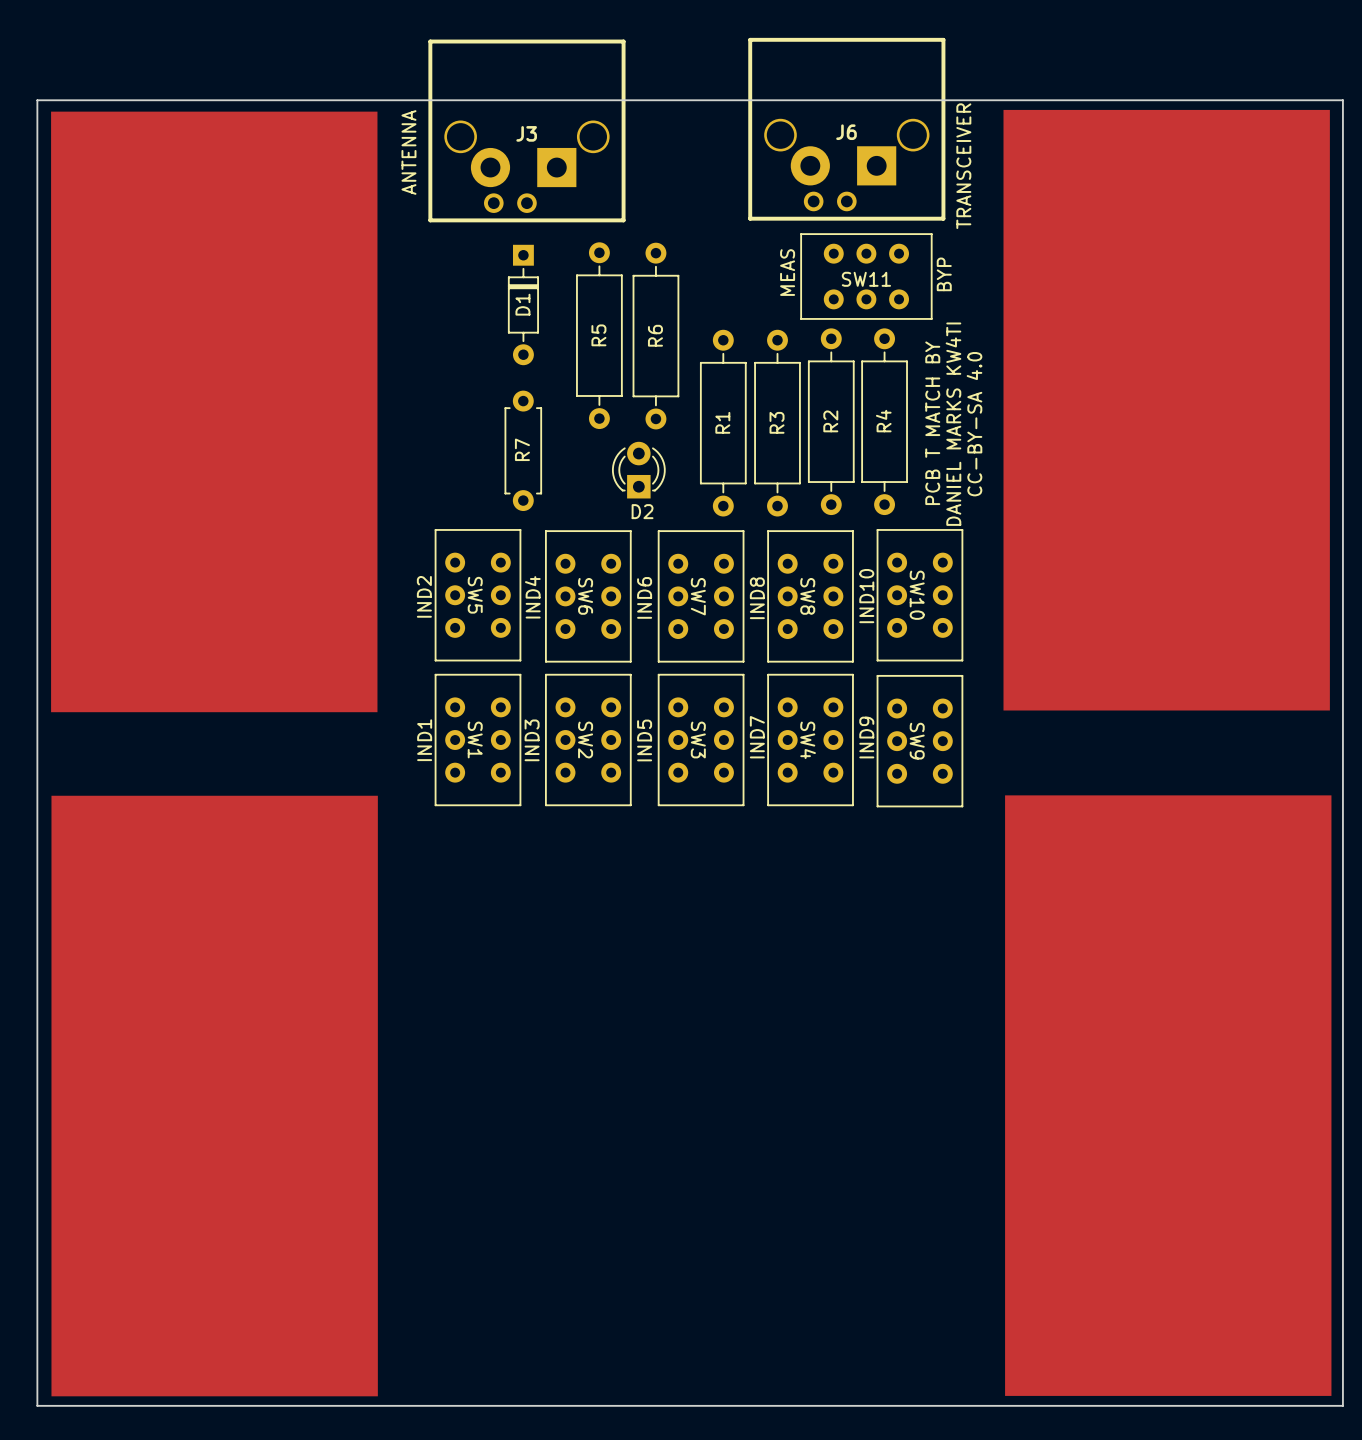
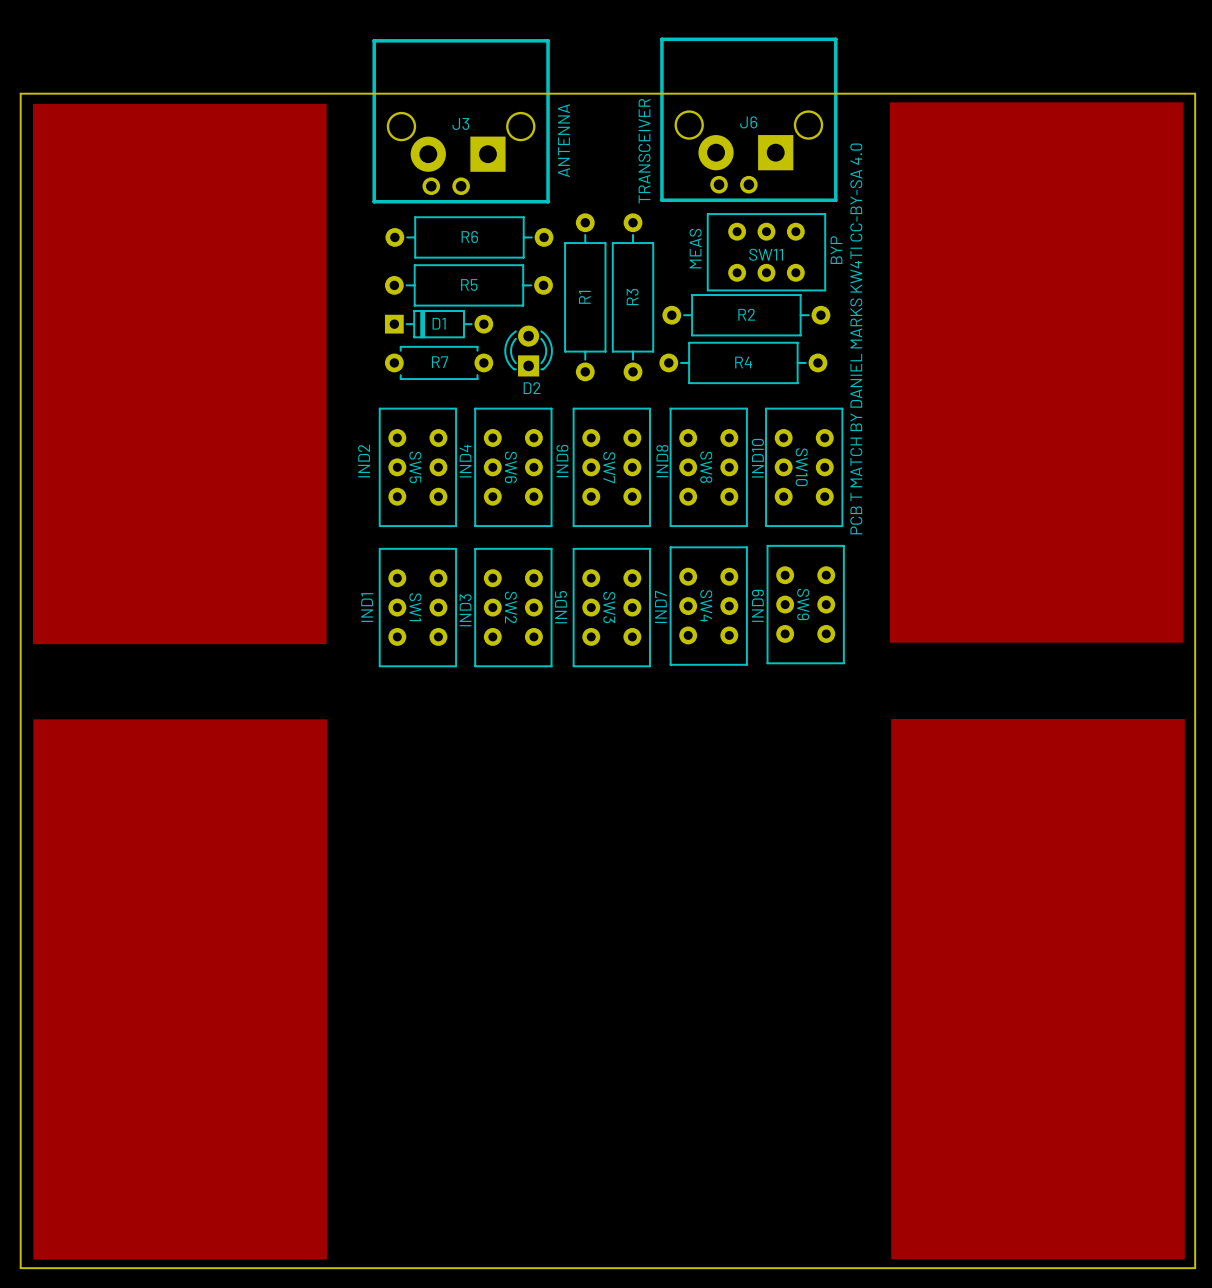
text position: ANTENNA (408, 152) -> ANTENNA (563, 140)
text position: TRANSCEIVER (963, 166) -> TRANSCEIVER (644, 151)
D1 rotation: 0° (523, 304) -> 90° counterclockwise (439, 324)
R5 rotation: 0° (599, 335) -> 90° clockwise (468, 285)
R6 rotation: 0° (655, 336) -> 90° clockwise (469, 237)
R6 position: (655, 336) -> (469, 237)
text: none -> PCB T MATCH BY DANIEL MARKS KW4TI CC-BY-SA 4.0 (856, 338)
R2 rotation: 0° (831, 421) -> 90° clockwise (746, 315)
R4 rotation: 0° (884, 421) -> 90° clockwise (743, 362)
R1 position: (723, 423) -> (585, 297)
R3 position: (777, 423) -> (633, 297)
text: PCB T MATCH BY (932, 423) -> none
text: DANIEL MARKS KW4TI (953, 424) -> none
text: CC-BY-SA 4.0 (974, 424) -> none
R7 rotation: 0° (523, 450) -> 90° clockwise (439, 362)
D2 position: (638, 470) -> (528, 351)
SW5 position: (478, 595) -> (417, 467)
SW10 position: (919, 595) -> (804, 467)
text position: IND2 (424, 596) -> IND2 (364, 461)
SW6 position: (588, 596) -> (513, 467)
SW7 position: (701, 596) -> (611, 467)
SW8 position: (810, 596) -> (708, 467)
text position: IND10 (866, 596) -> IND10 (757, 458)
text position: IND4 (532, 597) -> IND4 (465, 461)
text position: IND6 (644, 597) -> IND6 (562, 461)
text position: IND8 (757, 598) -> IND8 (662, 461)
text position: IND7 (757, 737) -> IND7 (660, 606)
text position: IND9 (866, 737) -> IND9 (757, 605)
text position: IND1 (424, 740) -> IND1 (367, 607)
SW1 position: (478, 740) -> (417, 607)
text position: IND3 (532, 740) -> IND3 (465, 610)
SW2 position: (588, 740) -> (513, 607)
text position: IND5 (644, 740) -> IND5 (561, 607)
SW3 position: (701, 740) -> (611, 607)
SW4 position: (810, 740) -> (708, 606)
SW9 position: (919, 741) -> (805, 604)

